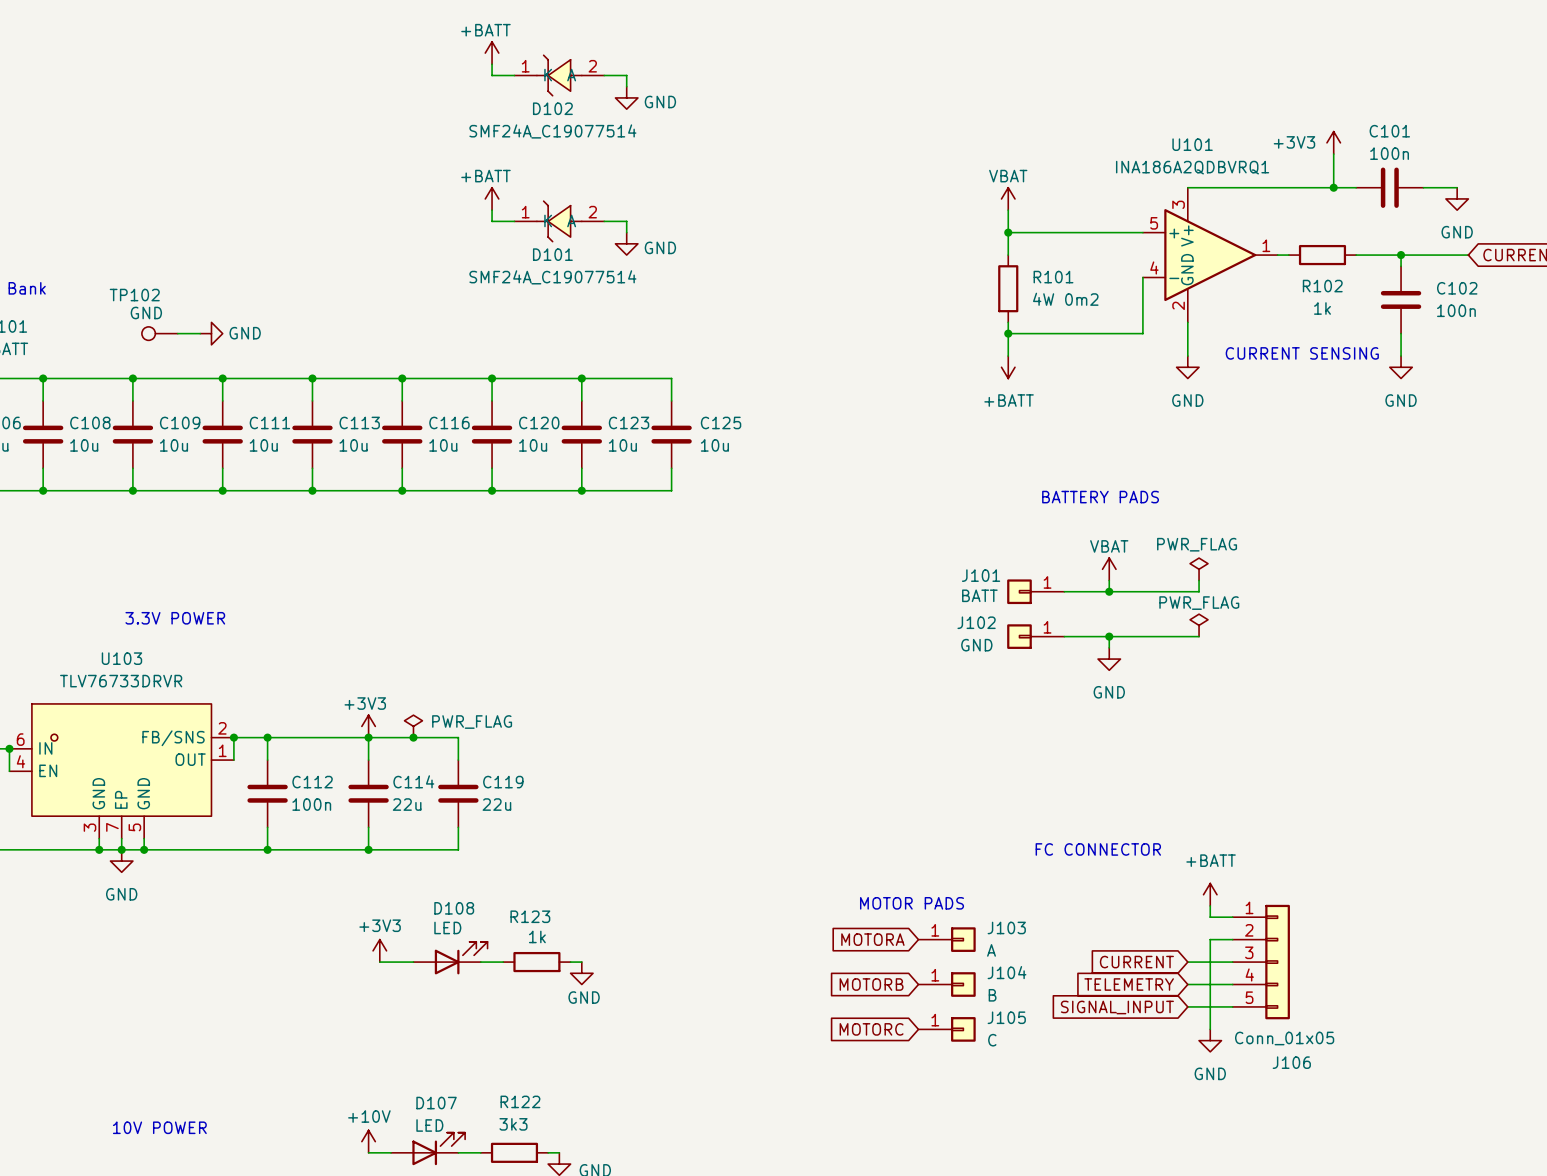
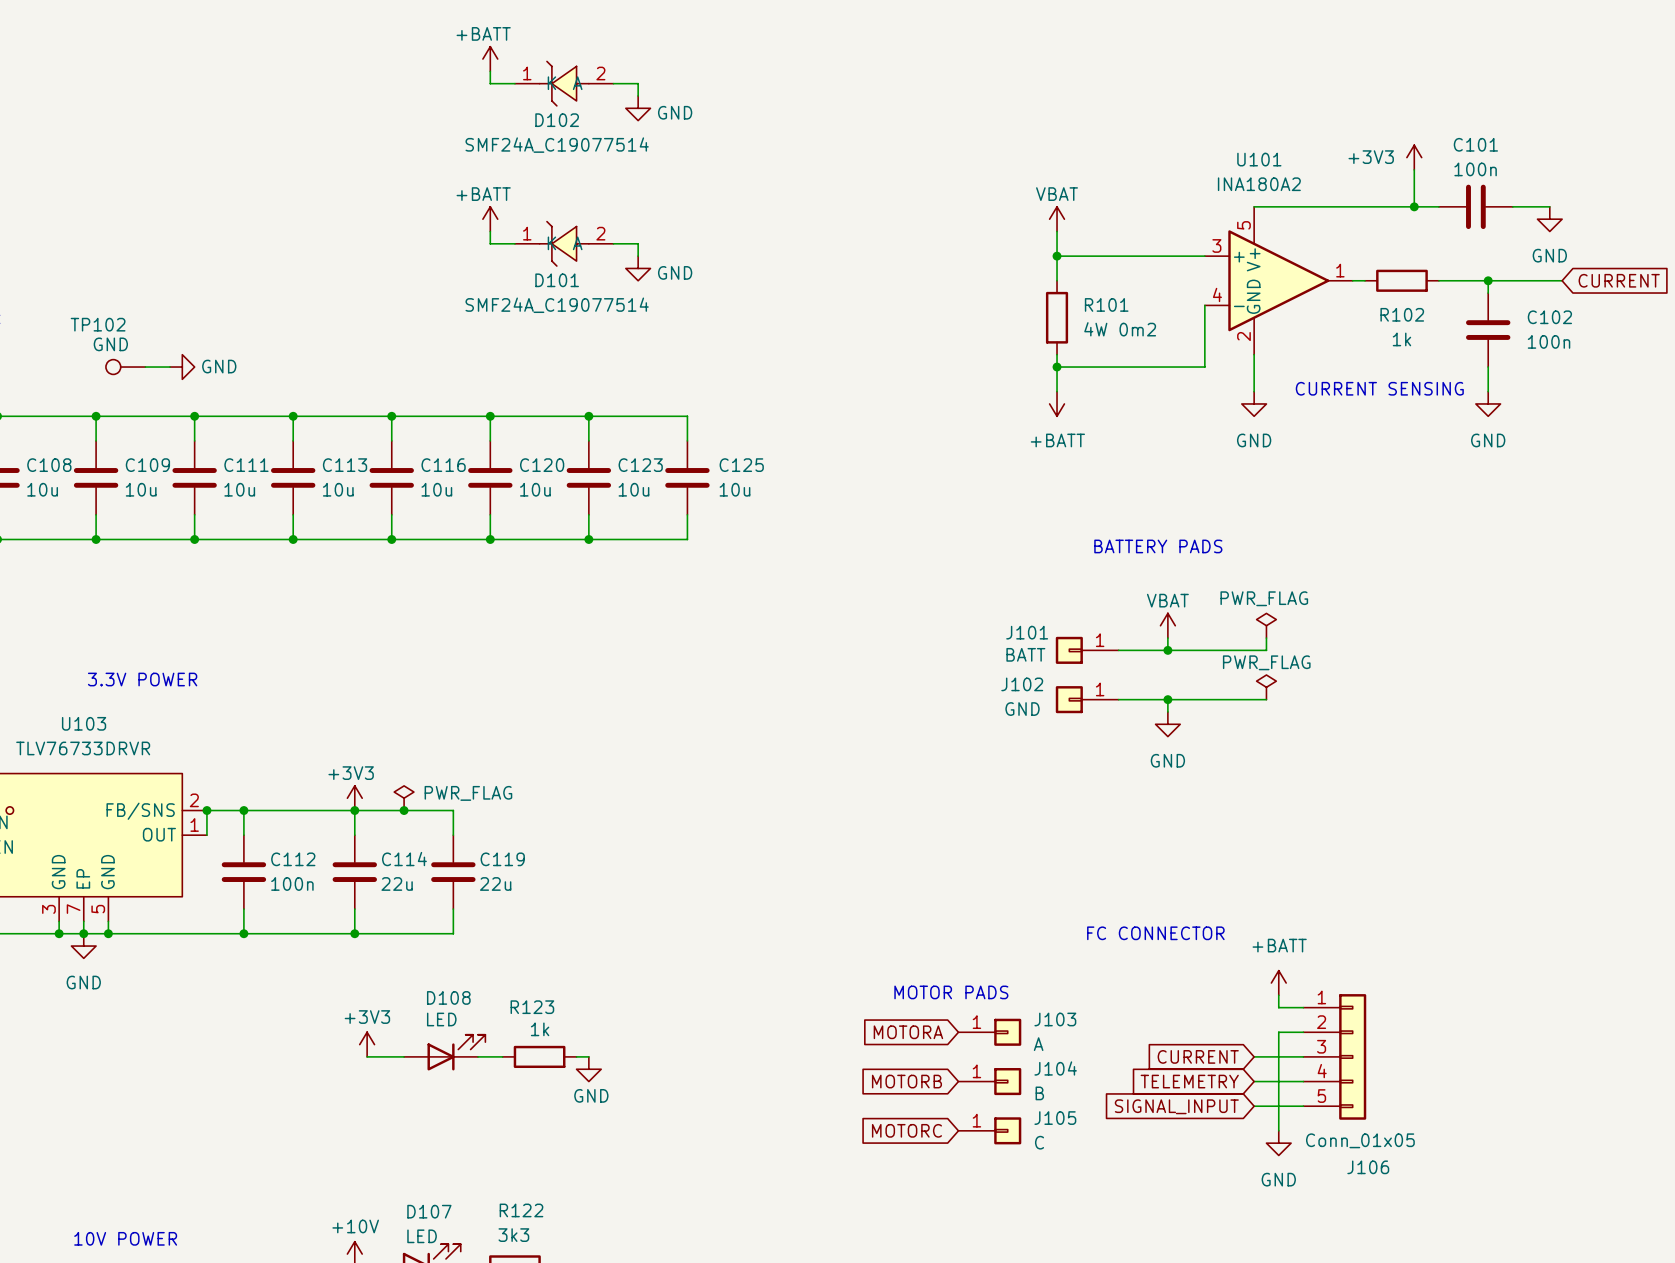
U101 value: INA186A2QDBVRQ1 (1192, 167) -> INA180A2 (1259, 184)
U101 pin number: 3 (1178, 204) -> 5 (1243, 225)
U101 pin number: 5 (1154, 223) -> 3 (1216, 245)

